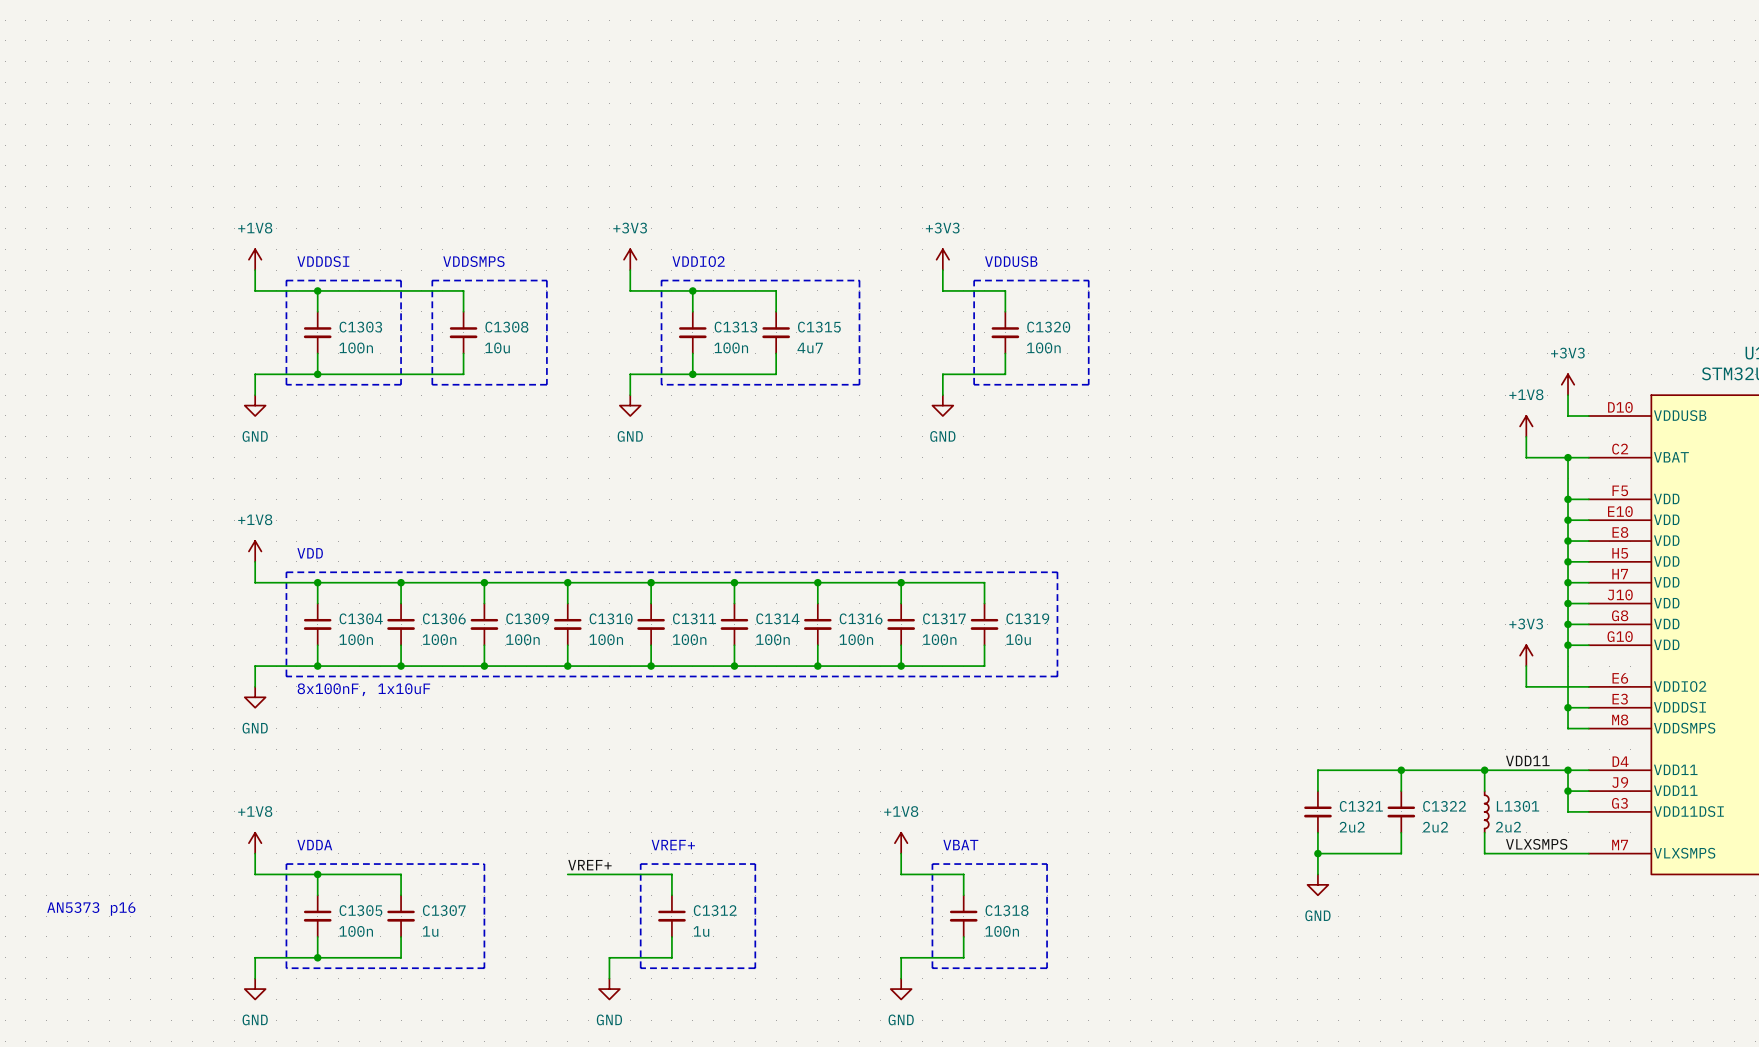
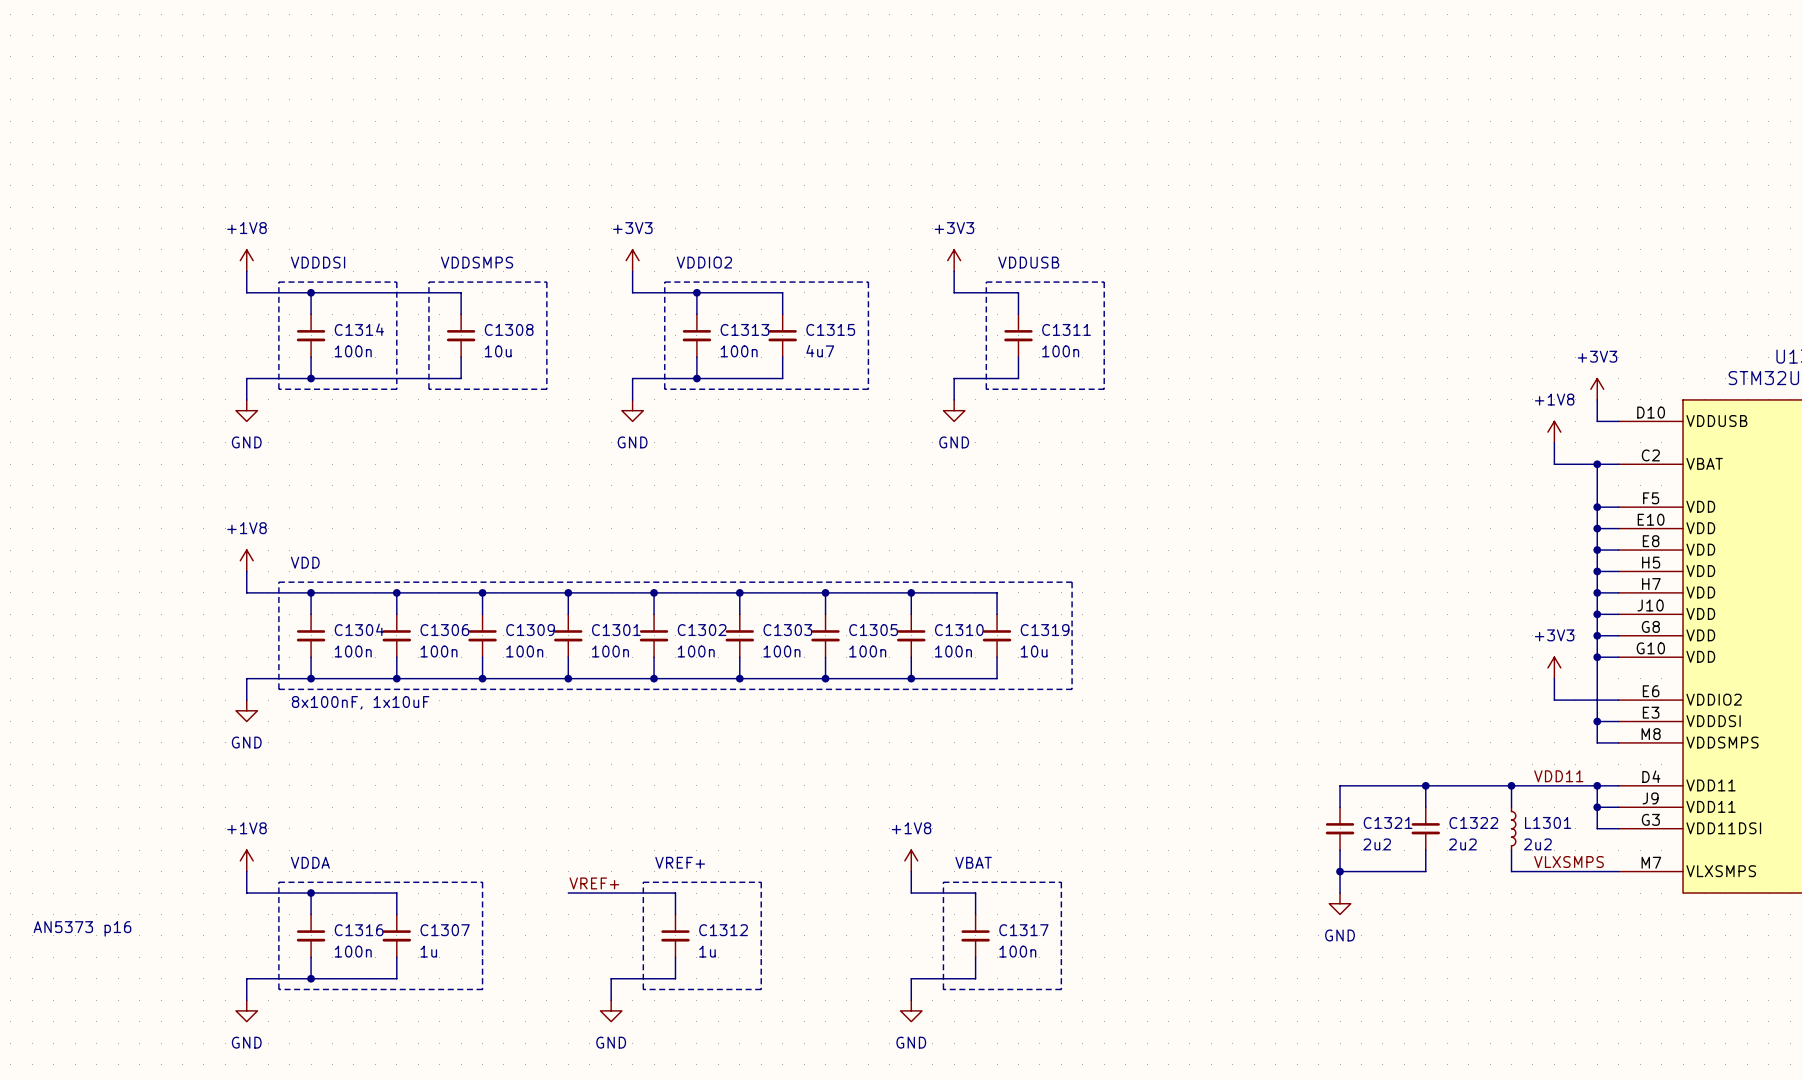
C1303 name: C1303 (360, 327) -> C1314 (359, 329)
C1320 name: C1320 (1048, 327) -> C1311 (1066, 329)
C1310 name: C1310 (611, 618) -> C1301 (616, 630)
C1311 name: C1311 (694, 618) -> C1302 (702, 630)
C1314 name: C1314 (777, 618) -> C1303 (787, 630)
C1316 name: C1316 (861, 618) -> C1305 (873, 630)
C1317 name: C1317 (944, 618) -> C1310 (959, 630)
C1305 name: C1305 (360, 910) -> C1316 (359, 930)
C1318 name: C1318 (1007, 910) -> C1317 (1023, 930)

